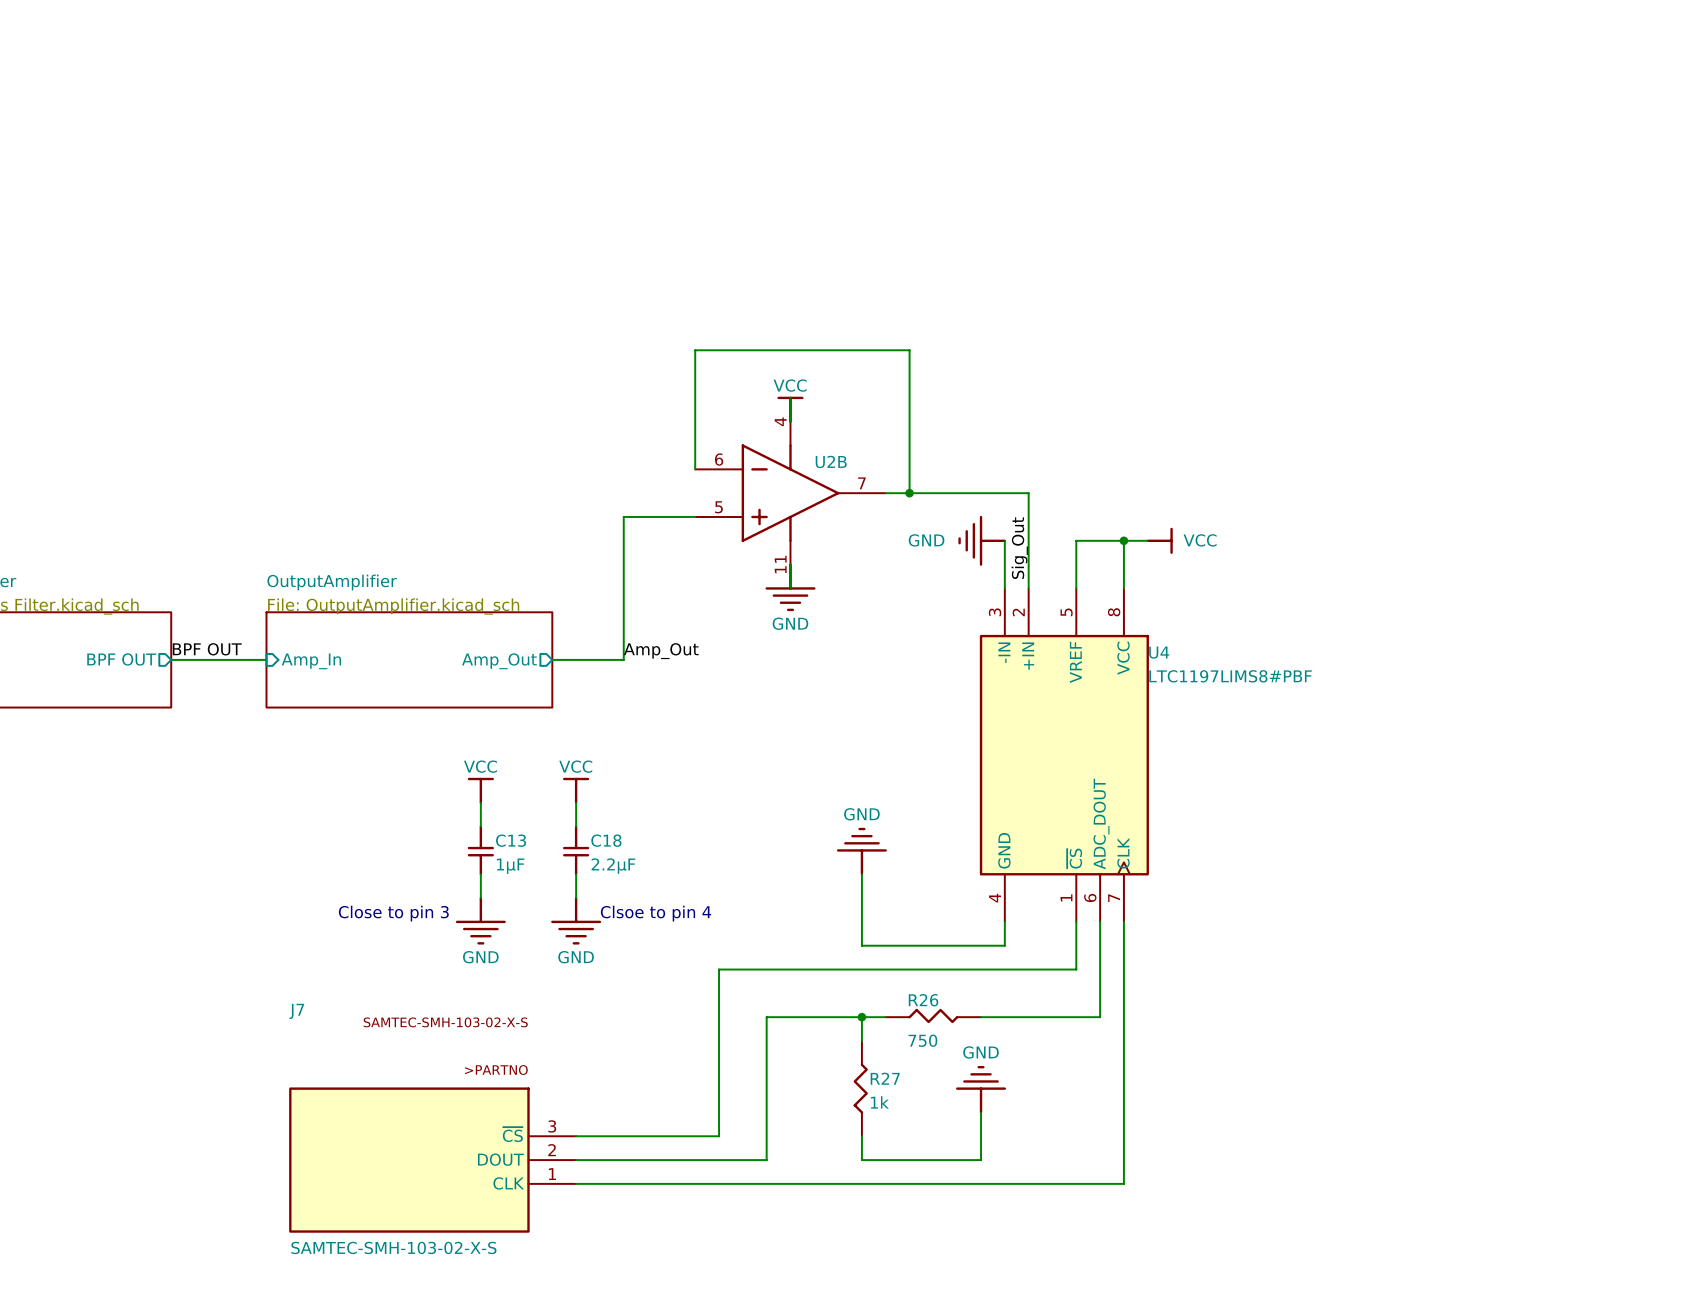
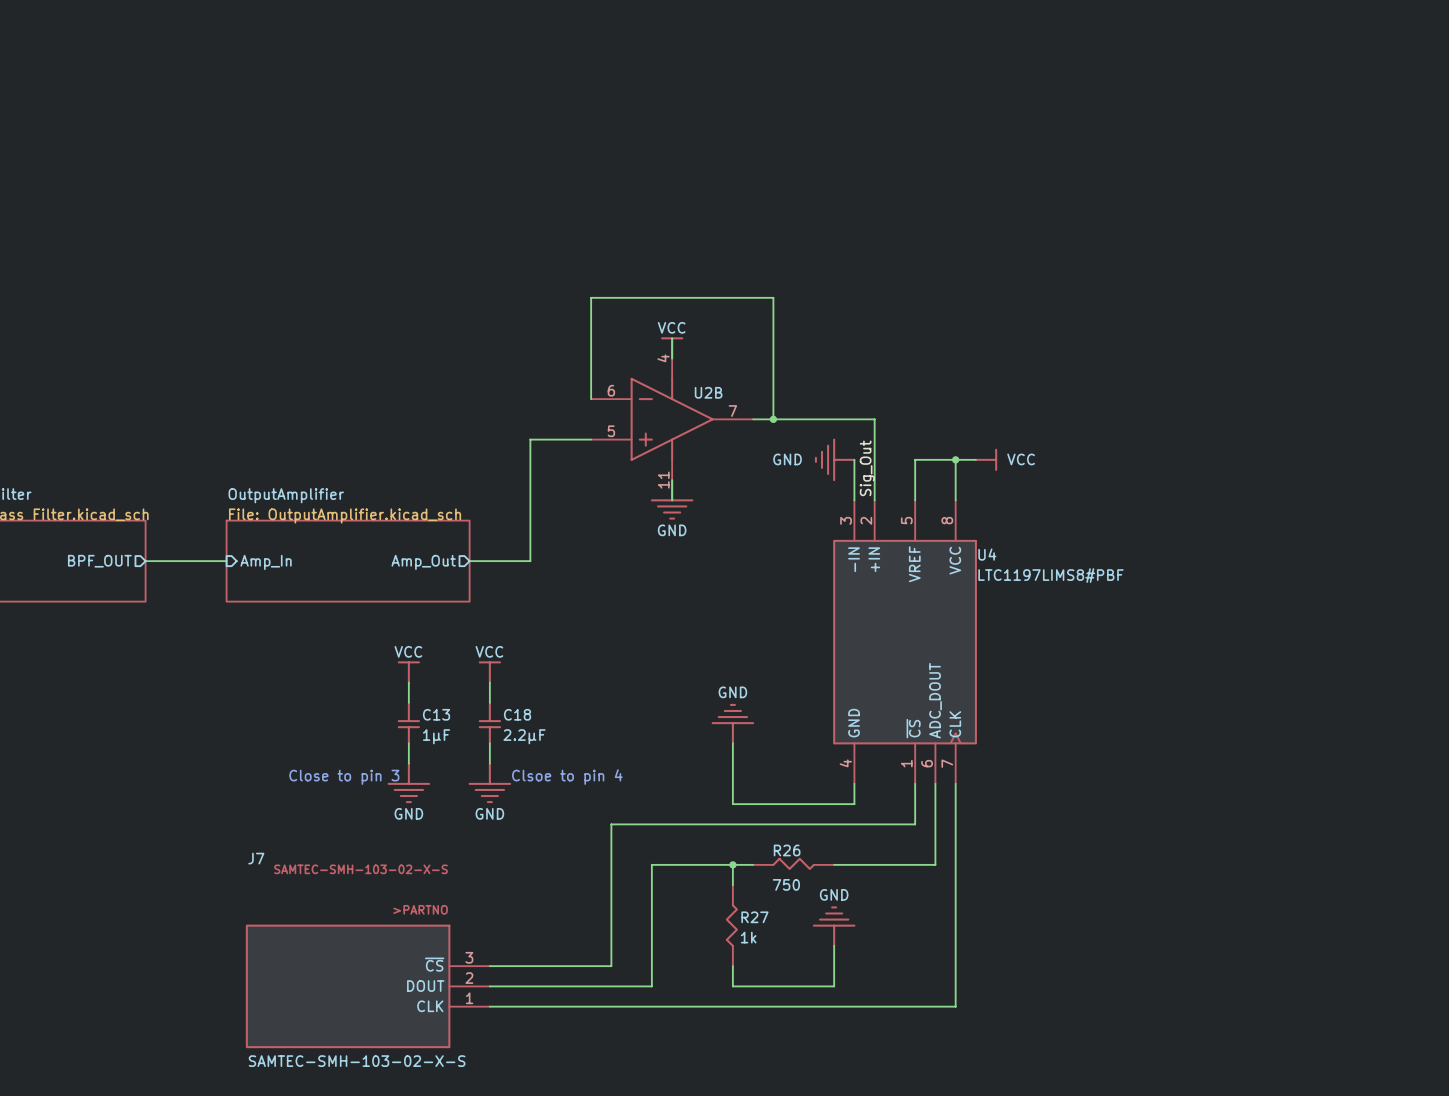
label: BPF OUT (207, 649) -> none
label: Amp_Out (661, 651) -> none
sheet pin: BPF OUT (121, 659) -> BPF_OUT (99, 561)

